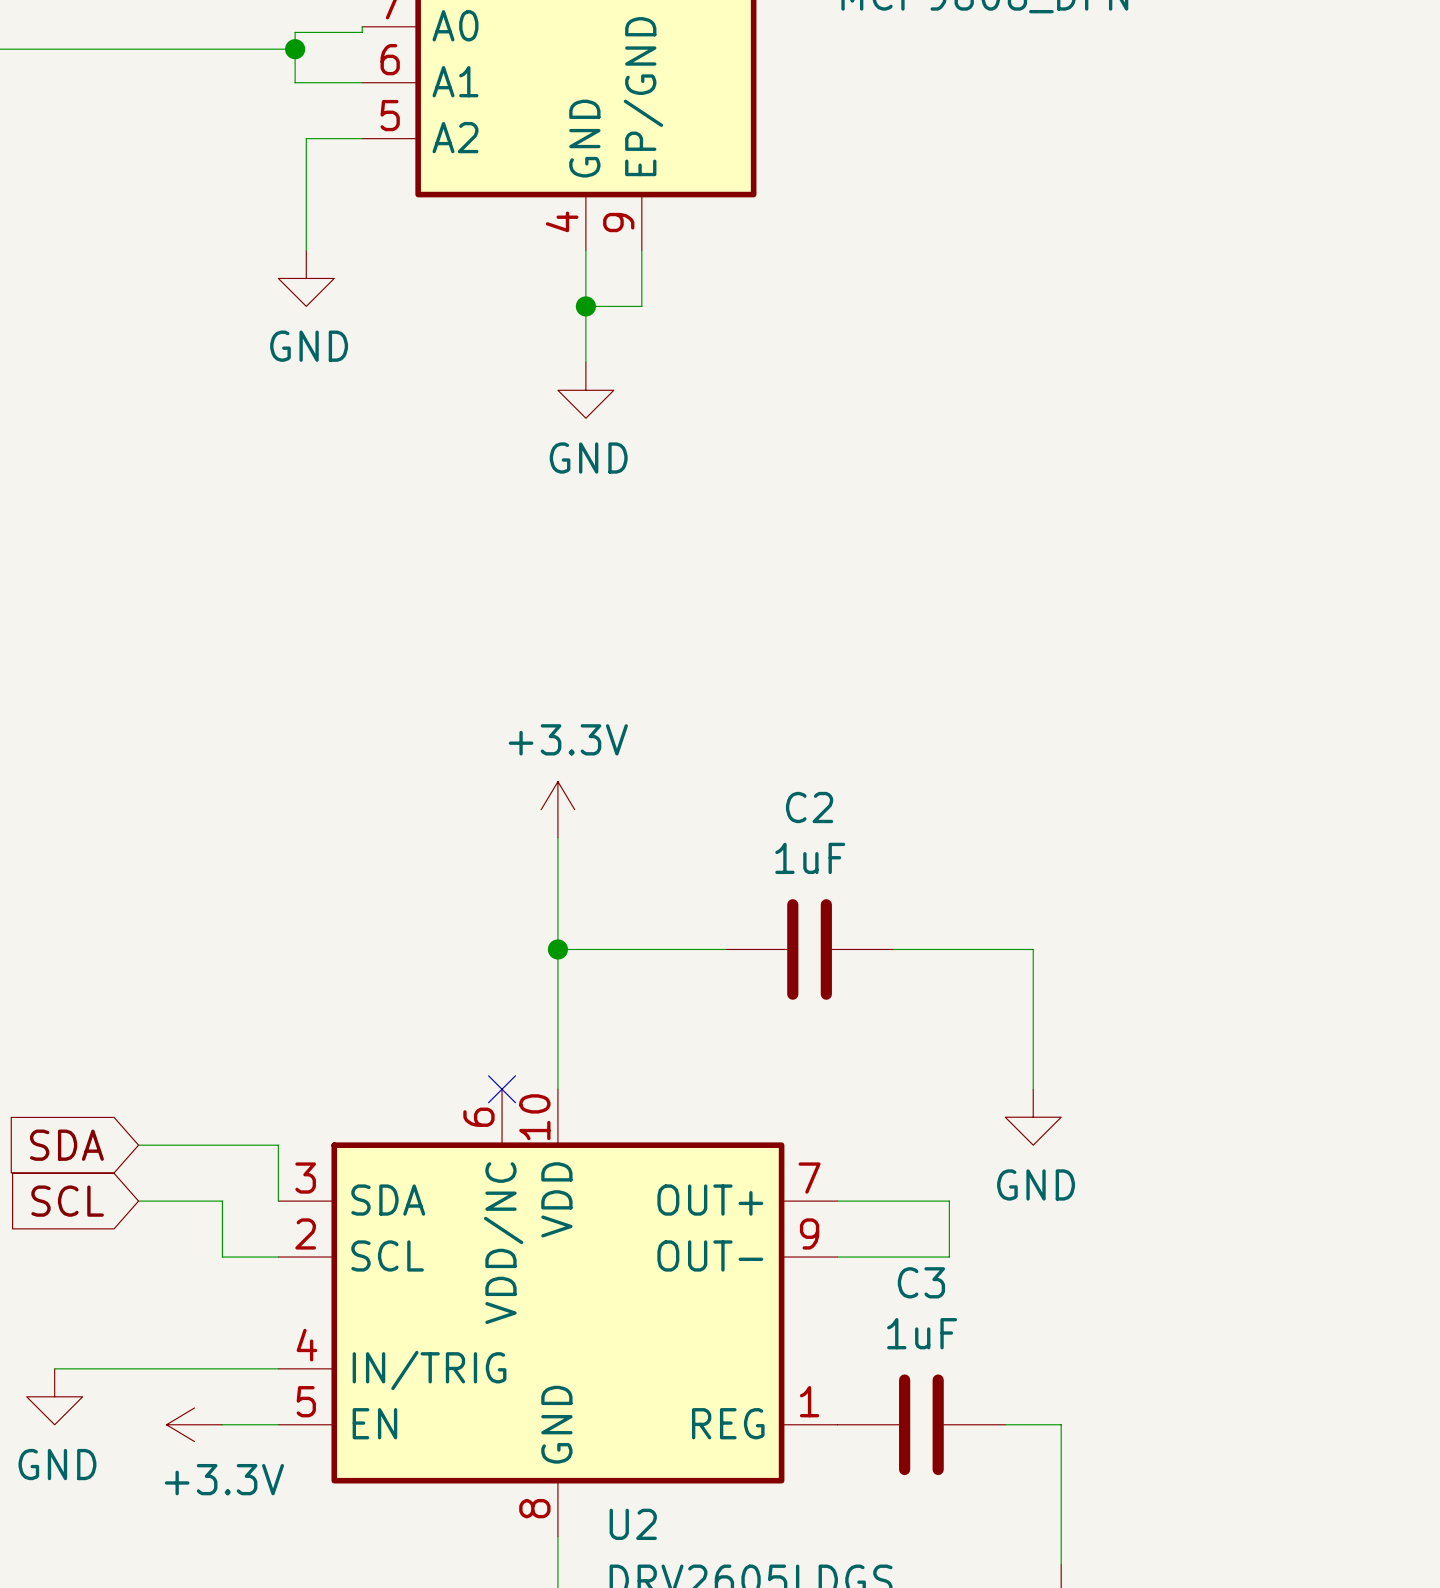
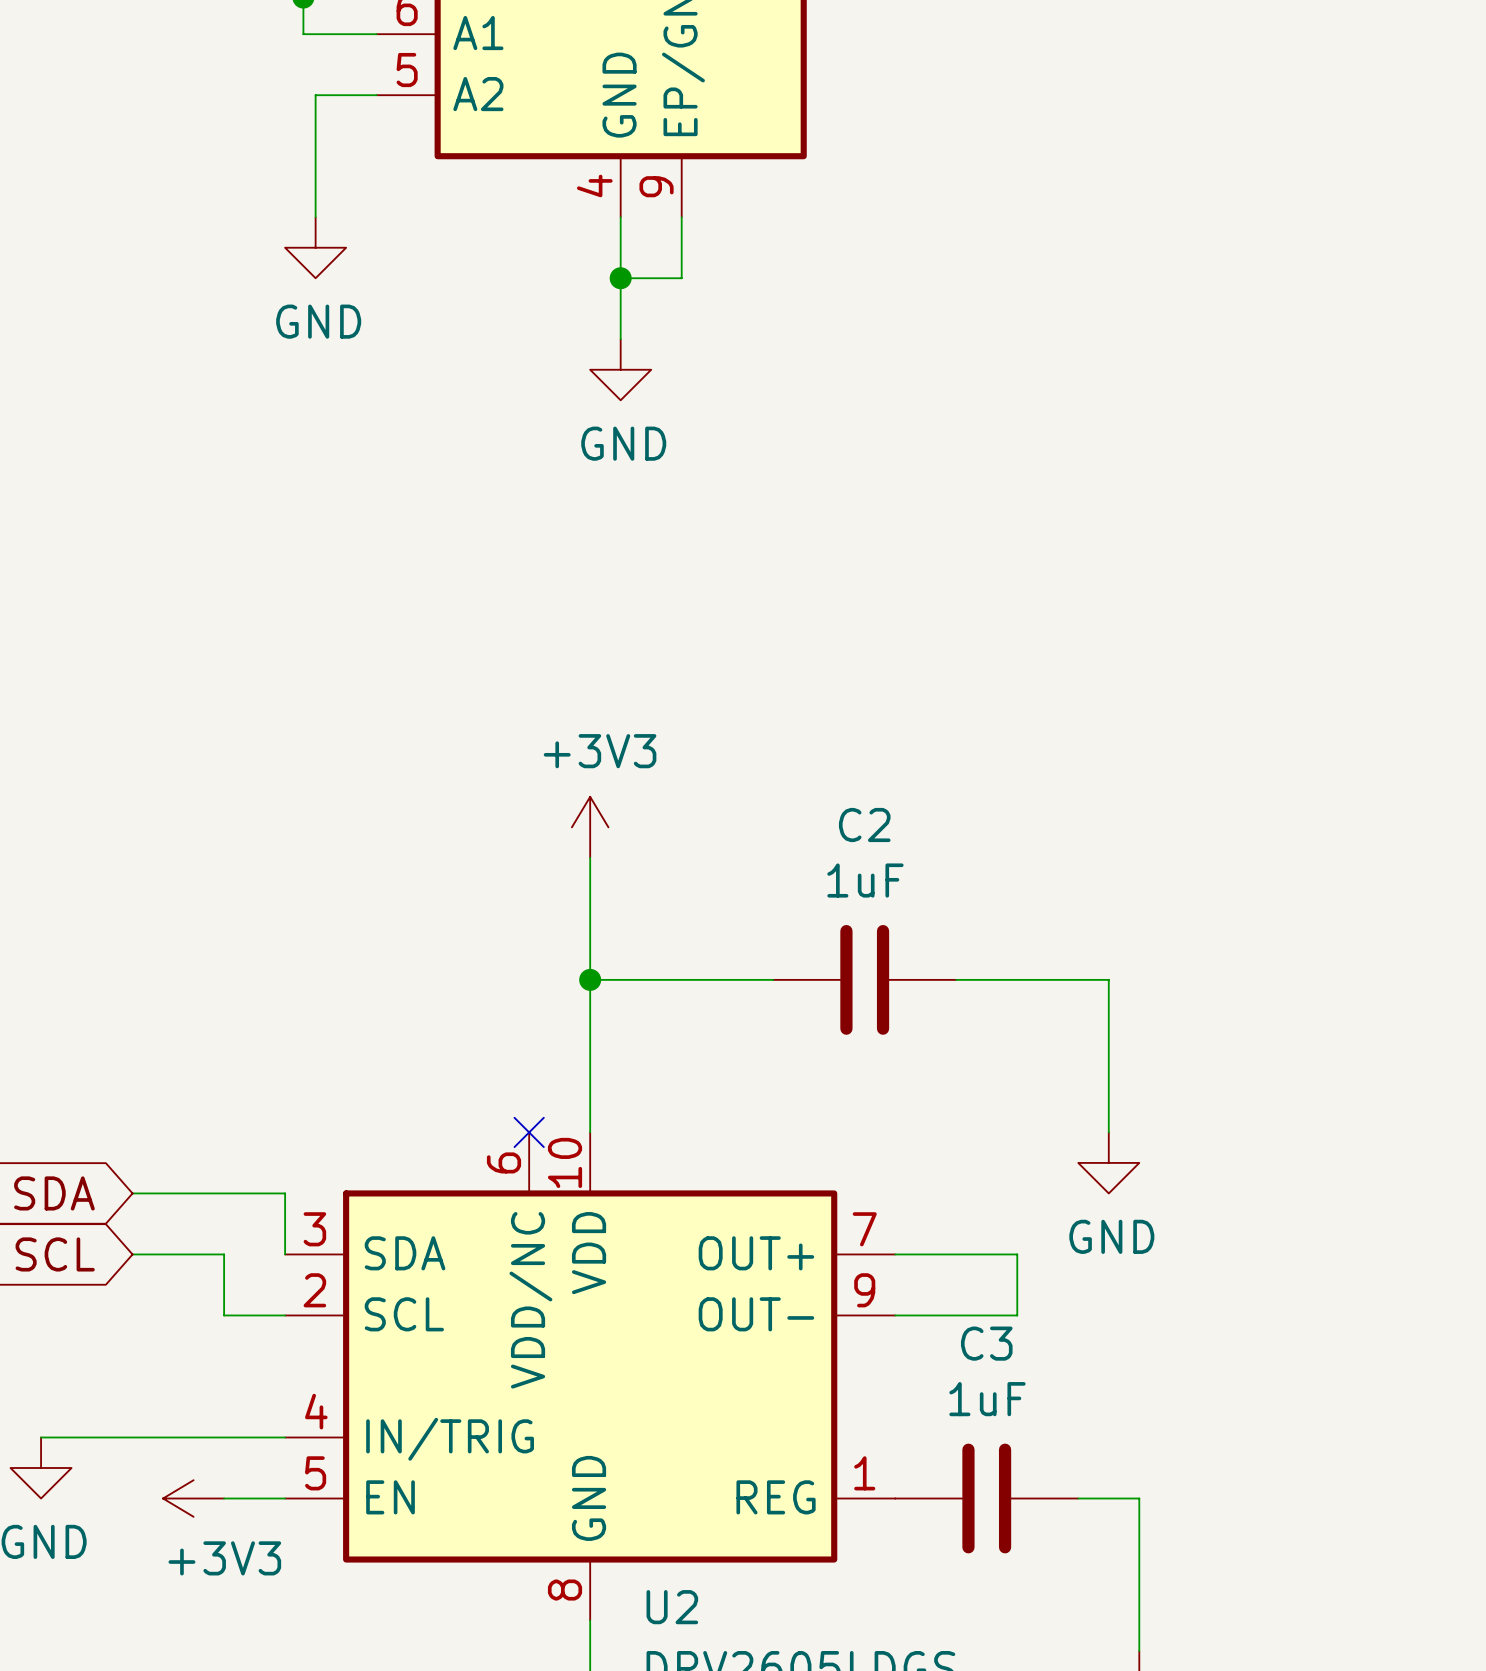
power symbol: +3.3V (557, 809) -> +3V3 (590, 827)
power symbol: +3.3V (194, 1424) -> +3V3 (193, 1498)

